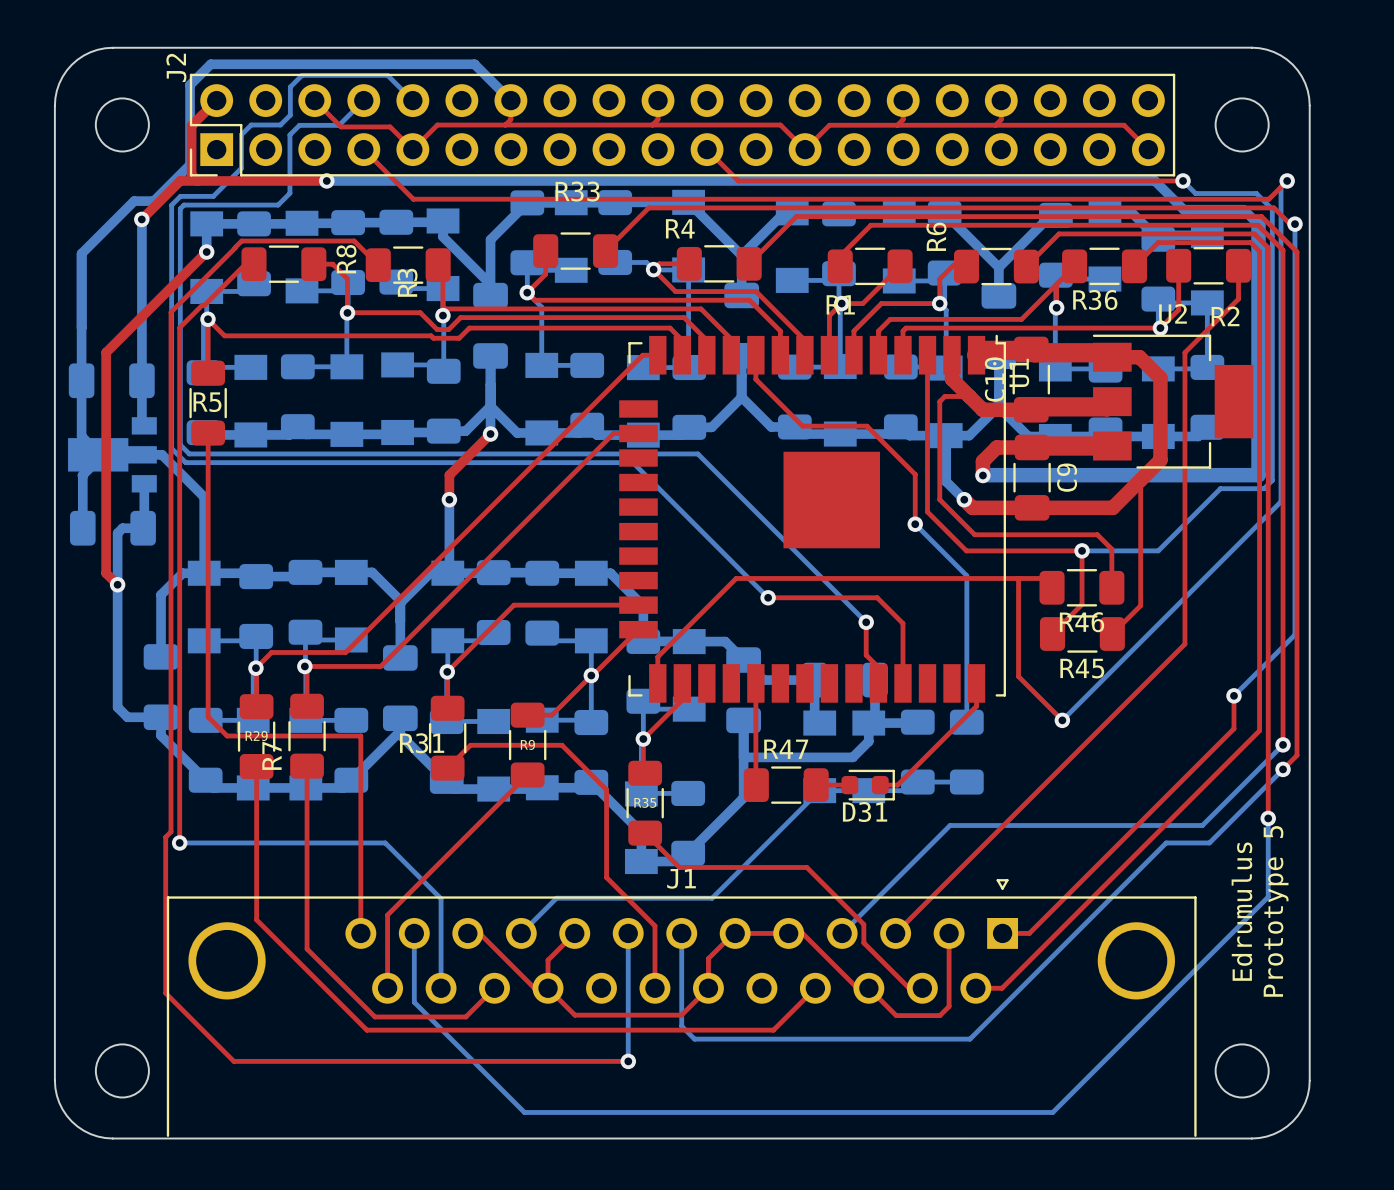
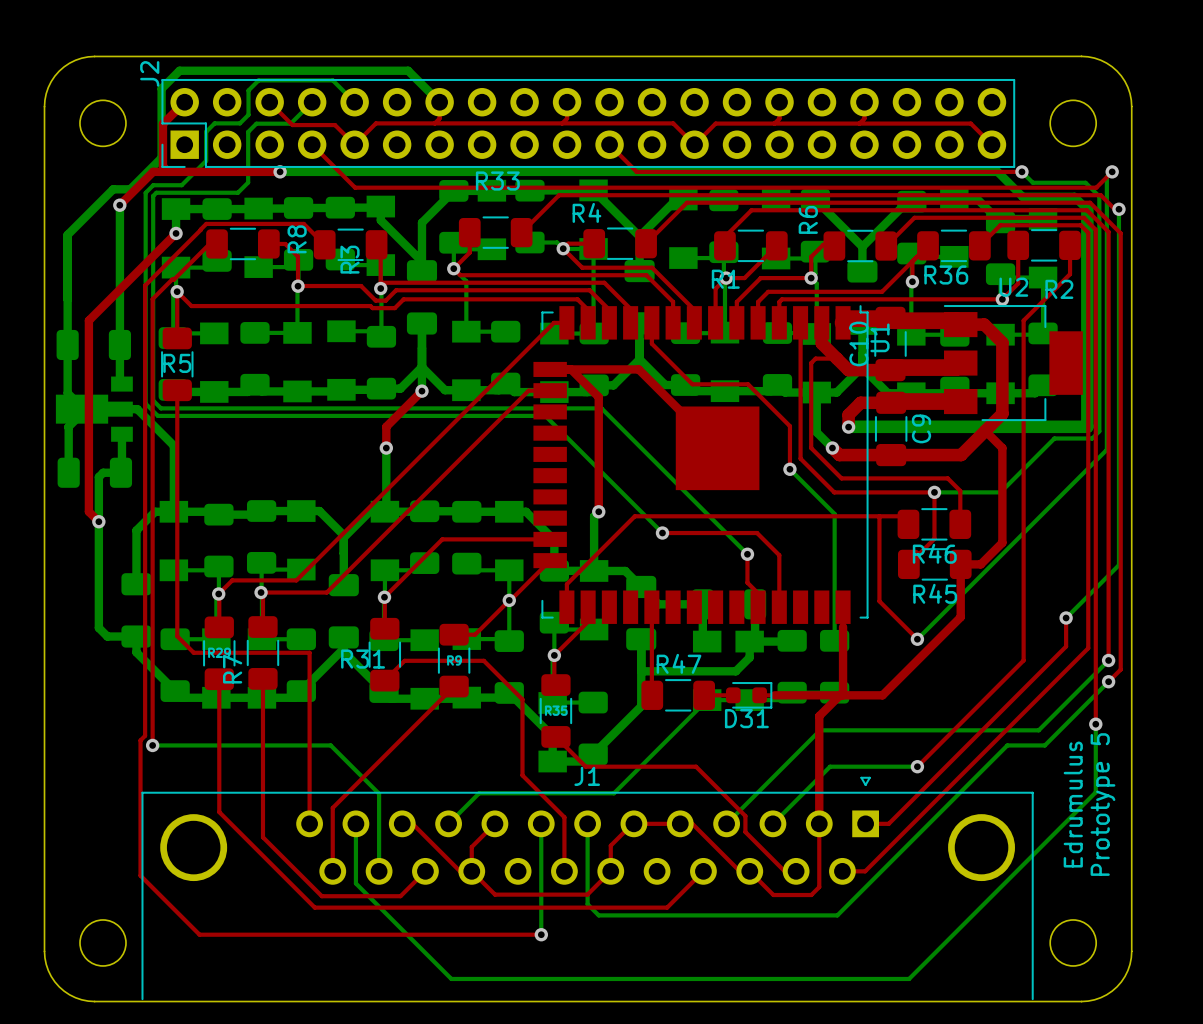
top track: none -> (550, 369) (638, 369) (717, 448)
top track: none -> (571, 369) (598, 397) (598, 511)
top track: (1140, 479) (1140, 605) (1112, 633) -> (985, 430) (1002, 448) (1002, 542) (980, 564) (960, 564) (960, 617) (882, 695) (774, 695)
bottom track: none -> (598, 511) (594, 516) (594, 570)
via: none -> (598, 511)
top track: (1184, 644) (895, 933) -> (1023, 573) (1023, 660) (917, 766)
top track: (976, 706) (897, 785) -> (843, 626) (843, 695)
top track: none -> (843, 692) (819, 716) (819, 823)
bottom track: none -> (917, 766) (830, 766) (772, 823)
via: none -> (917, 766)

